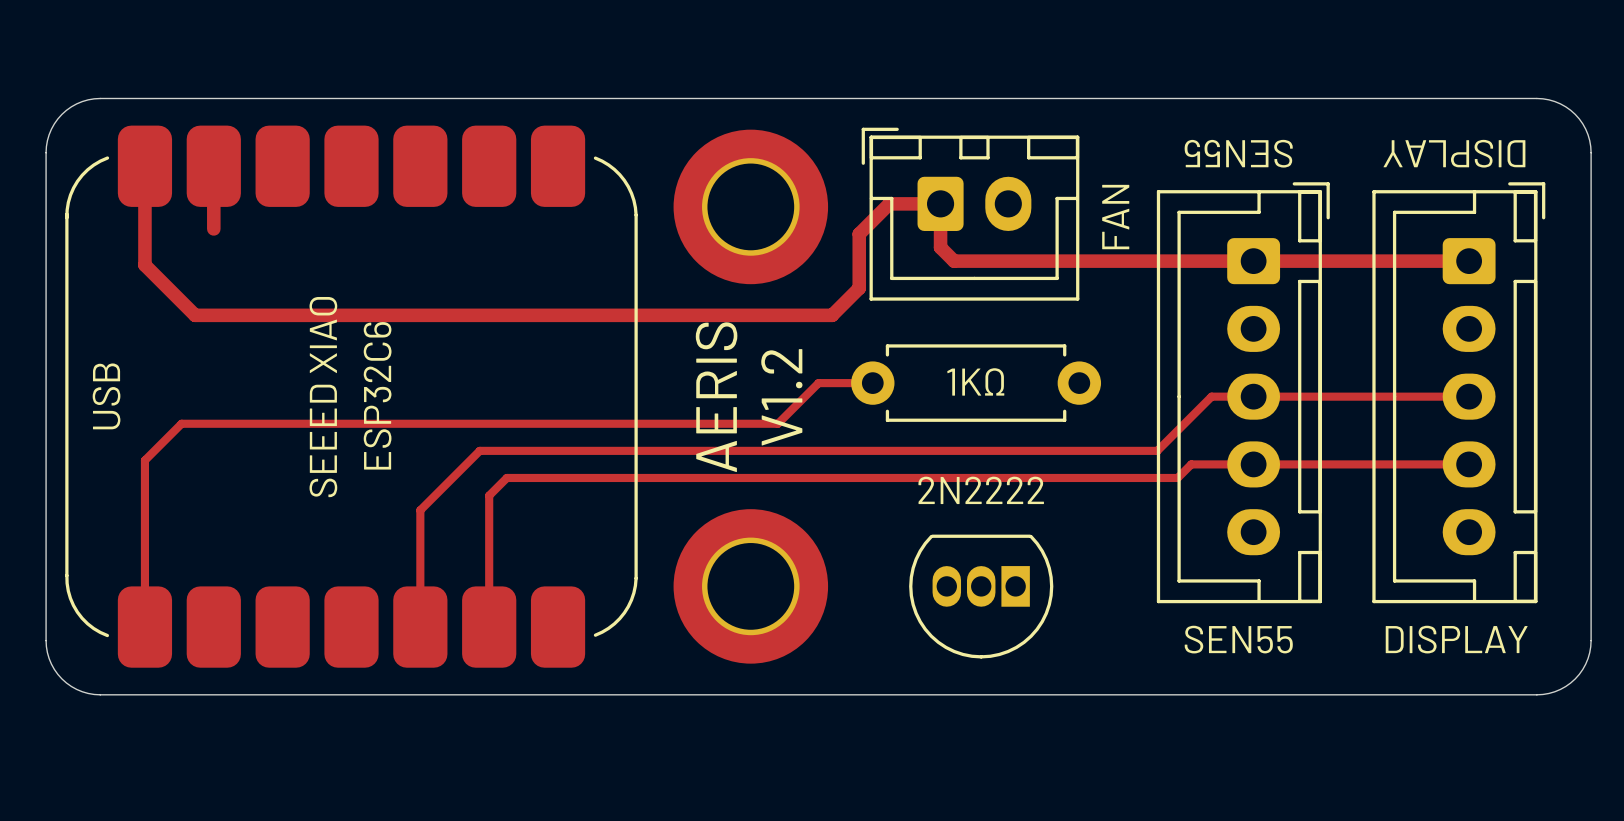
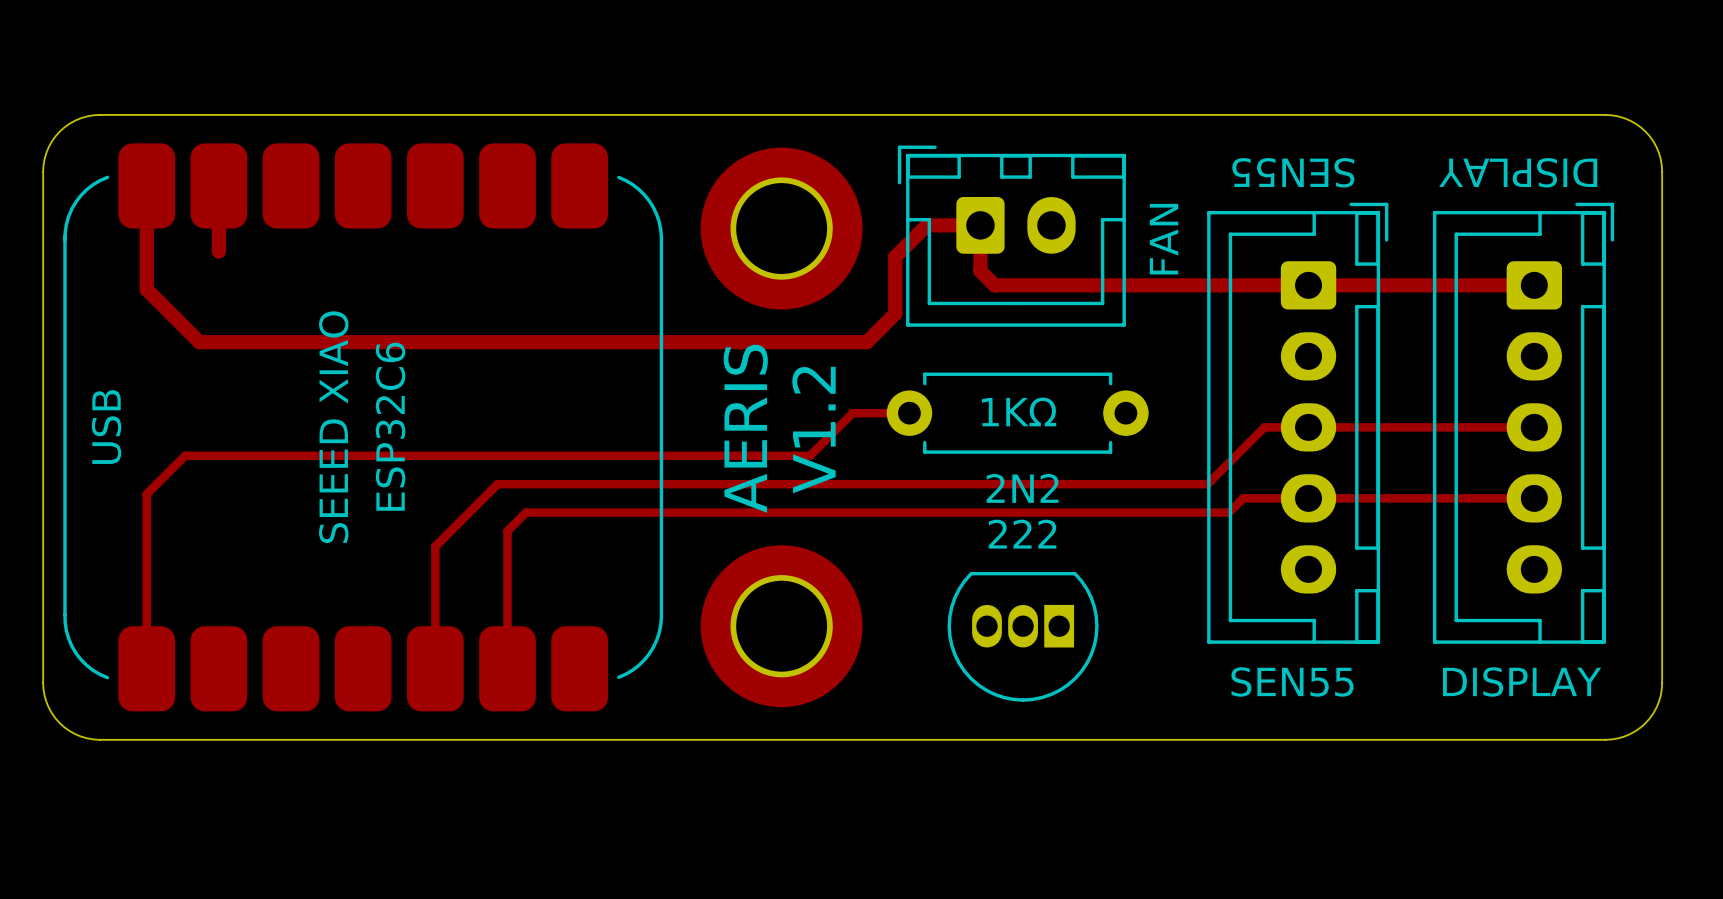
text: none -> 2N2 (1022, 488)
text: 2N2222 (981, 490) -> 222 (1022, 534)

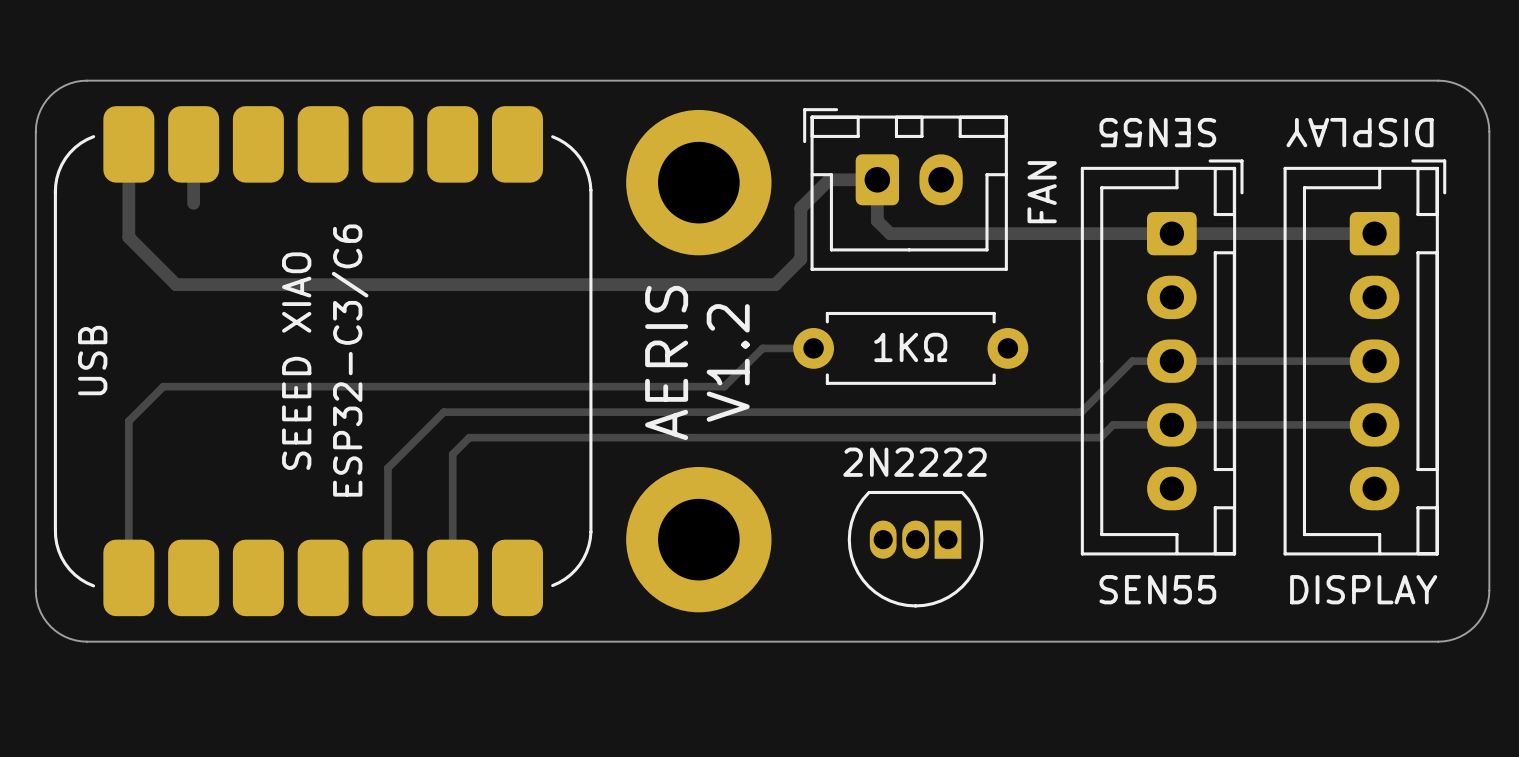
part text: ESP32C6 (390, 426) -> ESP32-C3/C6 (350, 360)
text: 2N2 (1022, 488) -> none
text: 222 (1022, 534) -> 2N2222 (914, 462)

